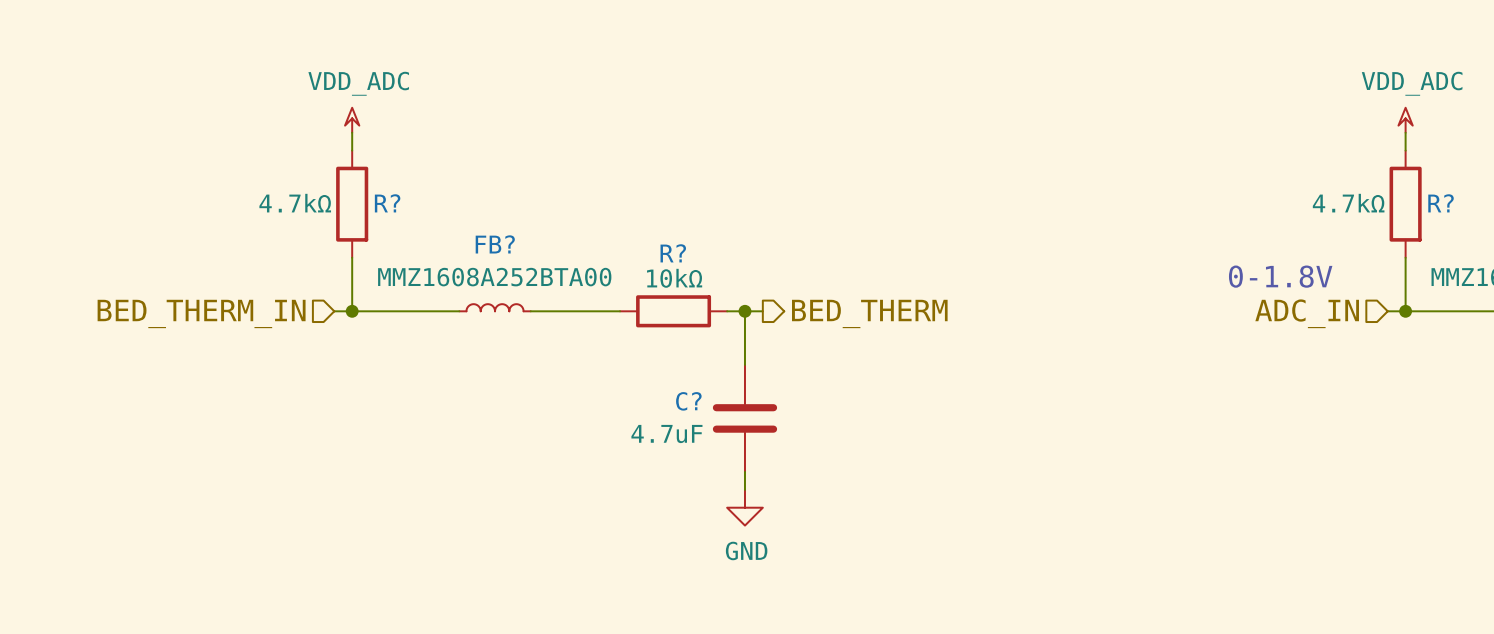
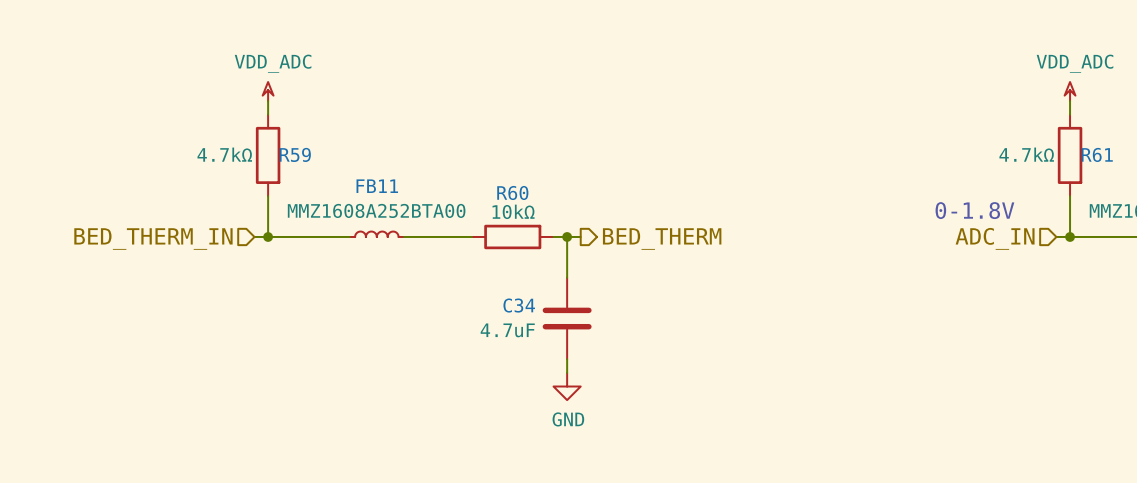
R? name: R? (387, 203) -> R59 (295, 154)
R? name: R? (1441, 203) -> R61 (1097, 154)
FB? name: FB? (495, 244) -> FB11 (377, 186)
R? name: R? (673, 253) -> R60 (512, 192)
C? name: C? (688, 401) -> C34 (519, 305)

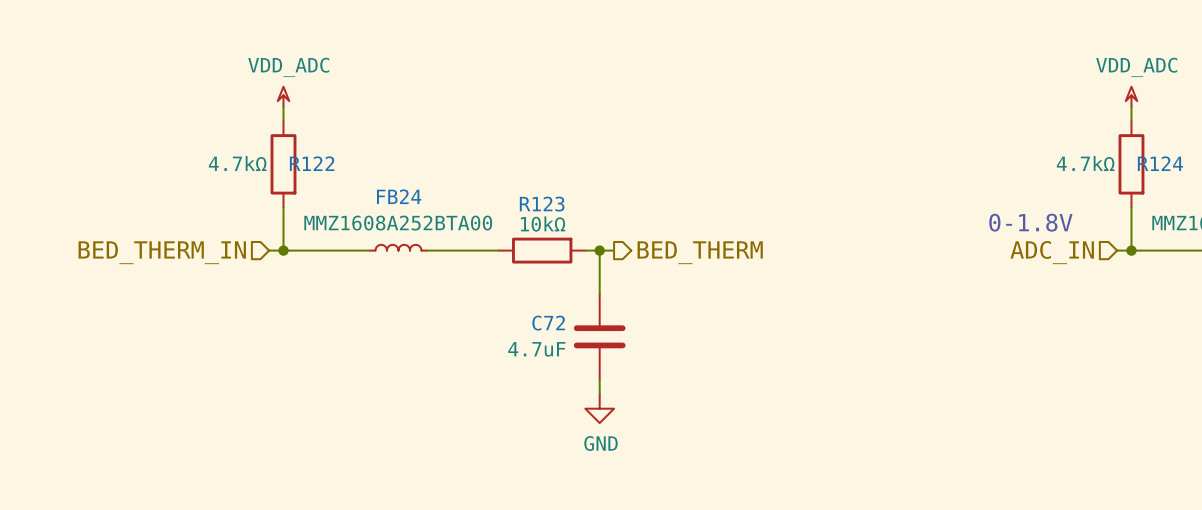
R59 name: R59 (295, 154) -> R122 (312, 163)
R61 name: R61 (1097, 154) -> R124 (1160, 163)
FB11 name: FB11 (377, 186) -> FB24 (399, 196)
R60 name: R60 (512, 192) -> R123 (542, 204)
C34 name: C34 (519, 305) -> C72 (548, 323)

